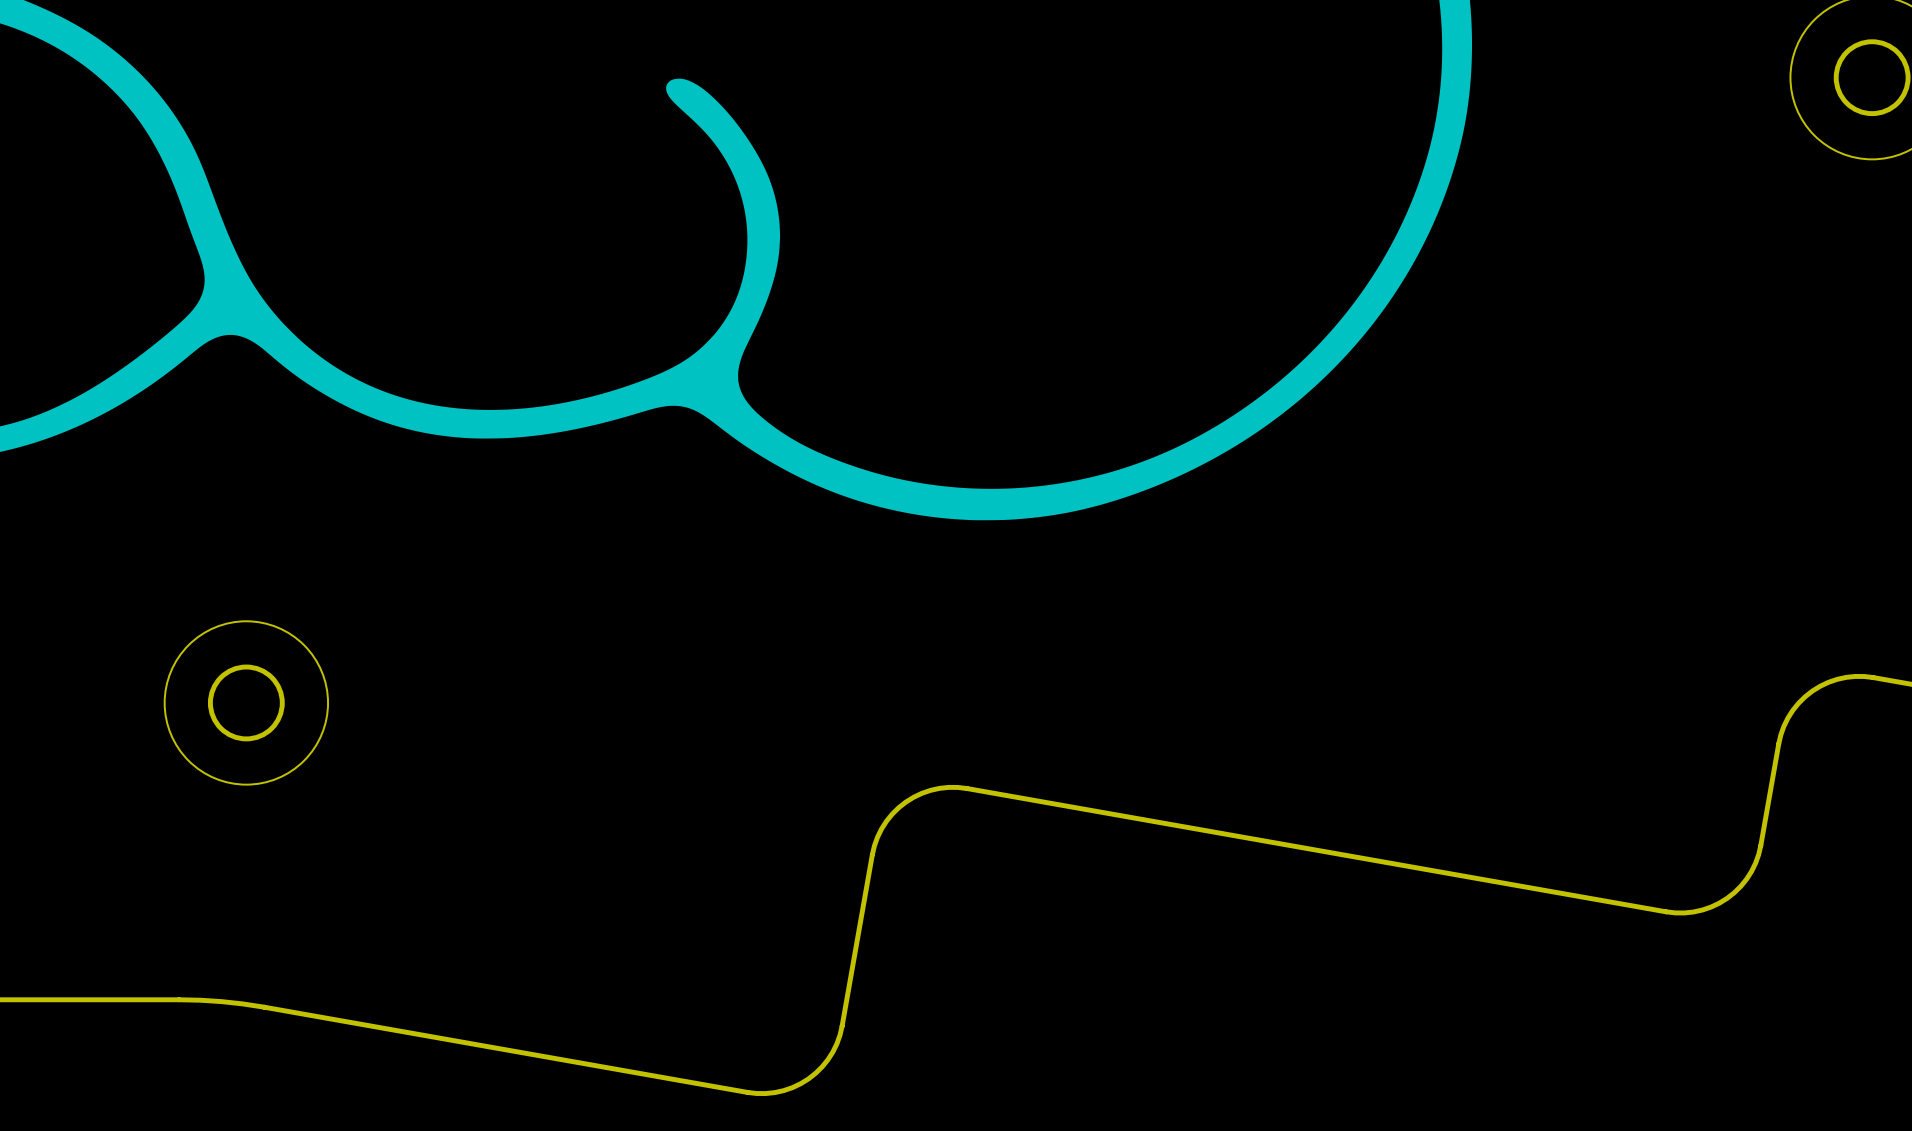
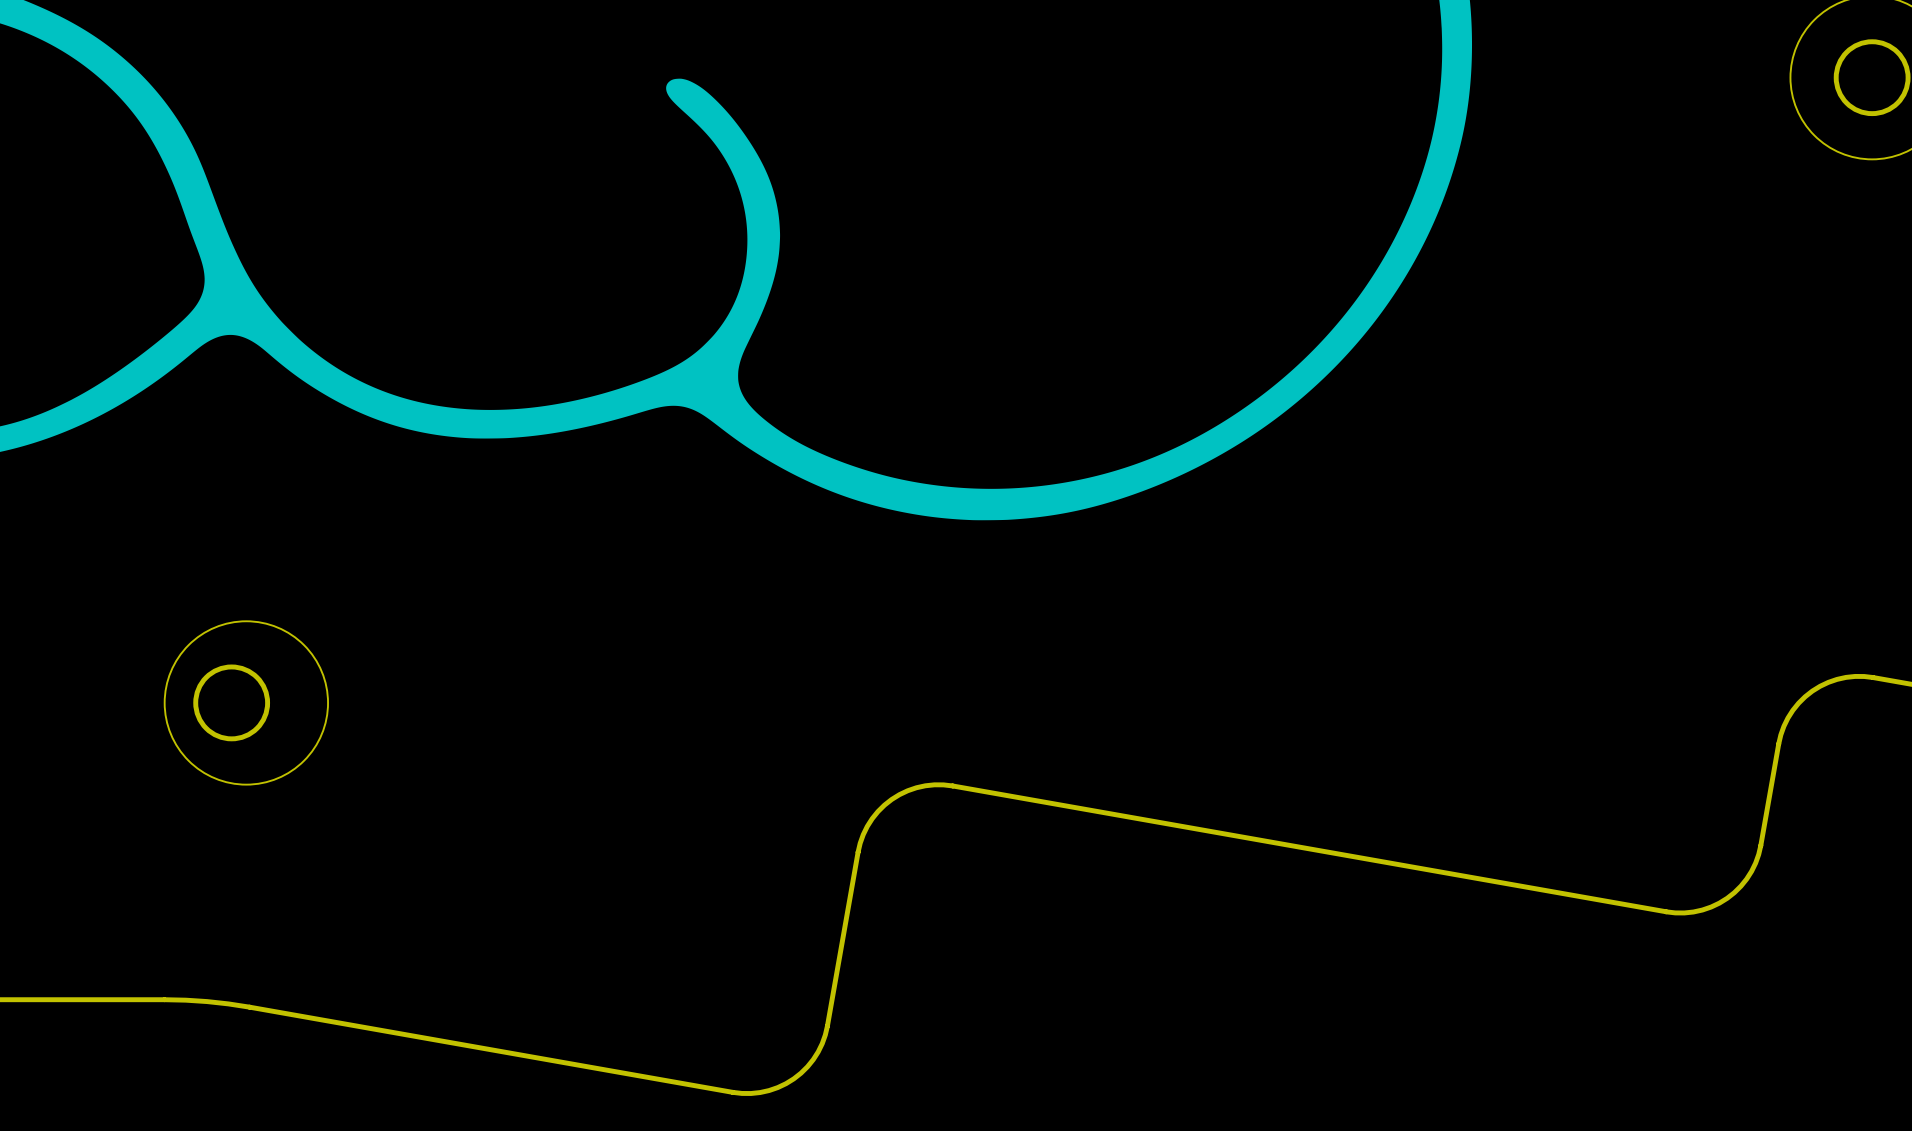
round board edge position: (246, 702) -> (231, 702)
board edge: (966, 788) (939, 788) (913, 797) (898, 807) (881, 829) (872, 854) (842, 1026) (836, 1043) (828, 1059) (815, 1073) (800, 1083) (783, 1090) (765, 1093) (747, 1092) (243, 1003) (164, 999) -> (966, 788) (943, 784) (916, 787) (891, 799) (872, 818) (863, 834) (858, 852) (827, 1026) (822, 1043) (813, 1059) (801, 1073) (786, 1083) (769, 1090) (751, 1093) (732, 1092) (249, 1007) (207, 1001) (164, 999)

